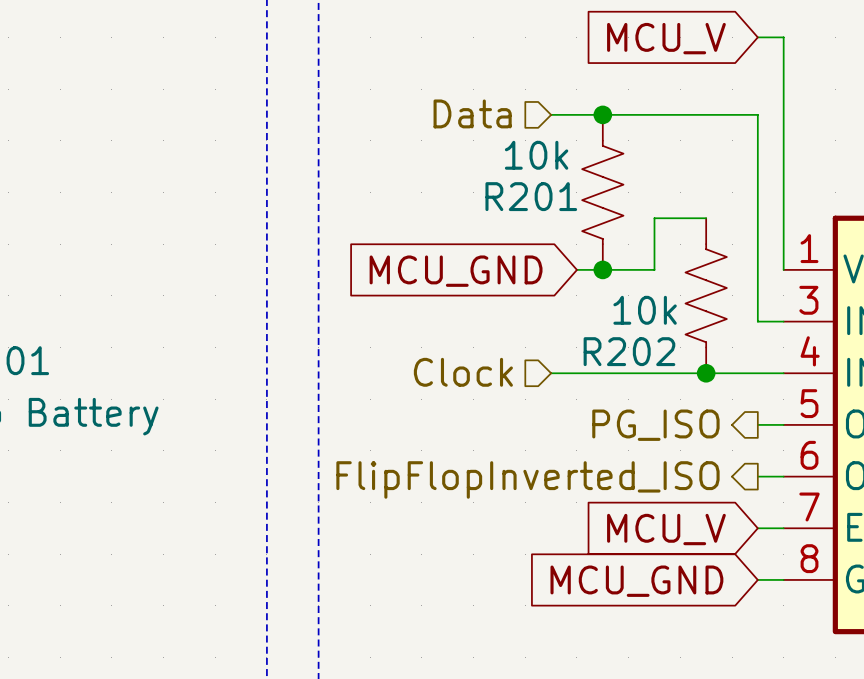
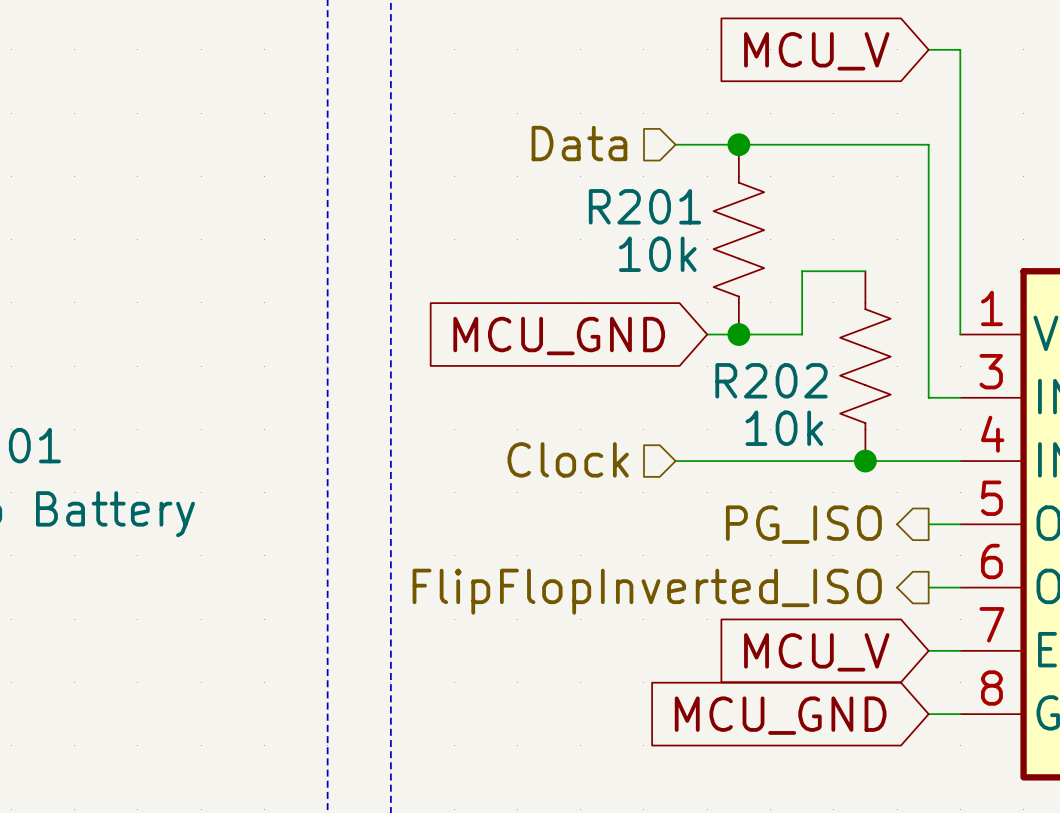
R201 value position: 10k (536, 155) -> 10k (657, 254)
R201 name position: R201 (531, 196) -> R201 (644, 206)
R202 value position: 10k (645, 310) -> 10k (784, 428)
R202 name position: R202 (629, 351) -> R202 (771, 380)

